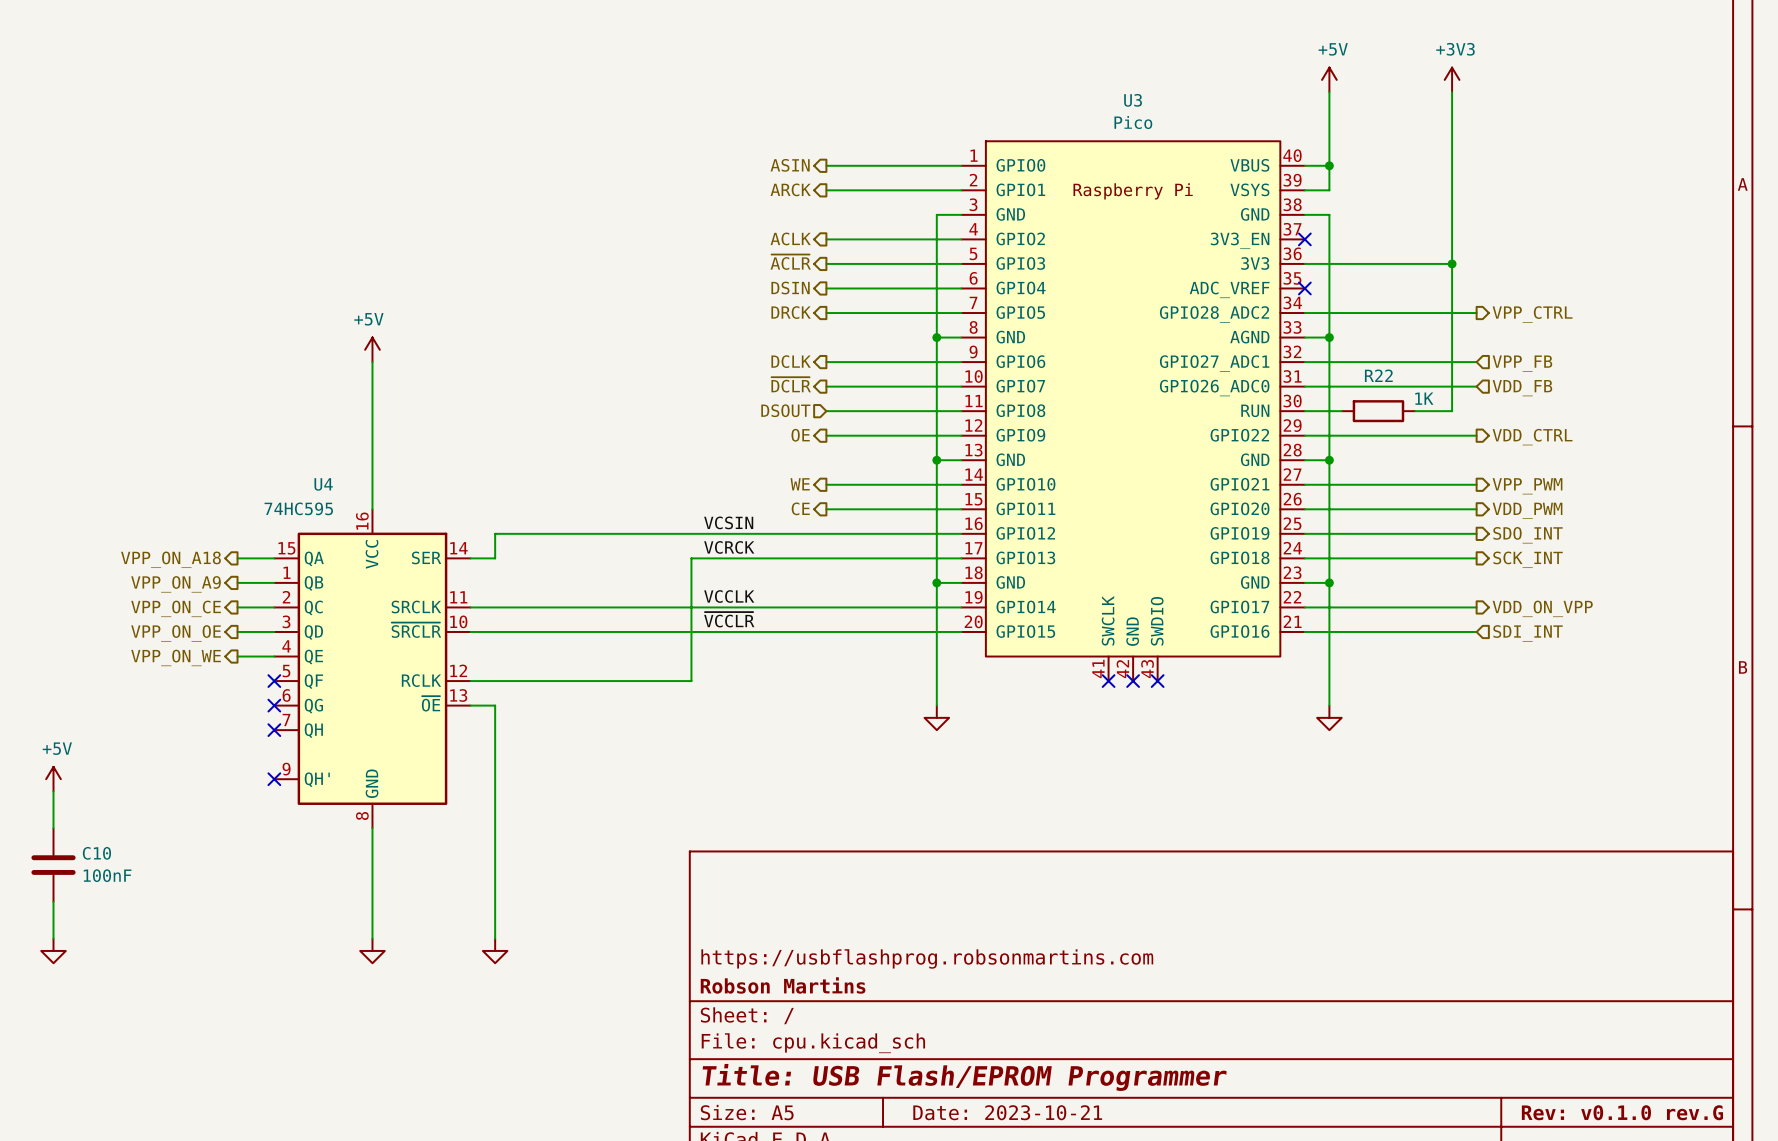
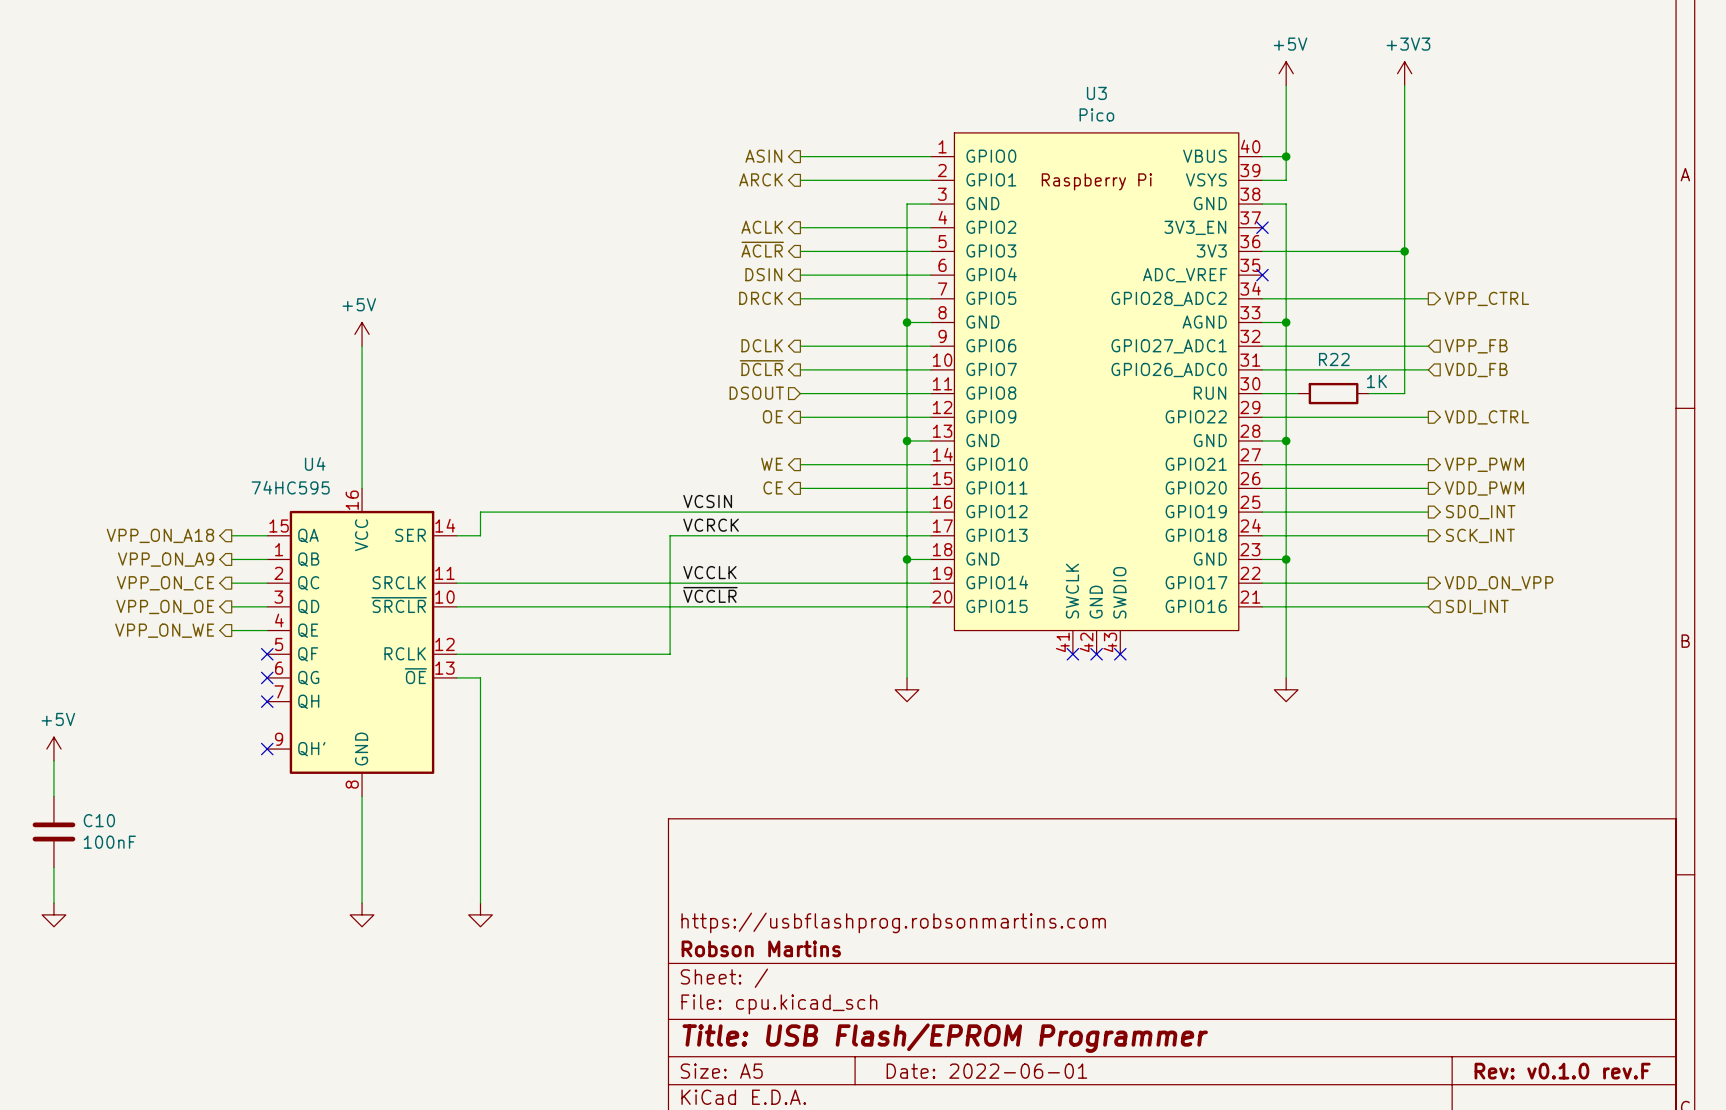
title block: Date: 2023-10-21 (1007, 1112) -> Date: 2022-06-01 (986, 1071)
title block: Rev: v0.1.0 rev.G (1622, 1112) -> Rev: v0.1.0 rev.F (1562, 1071)

